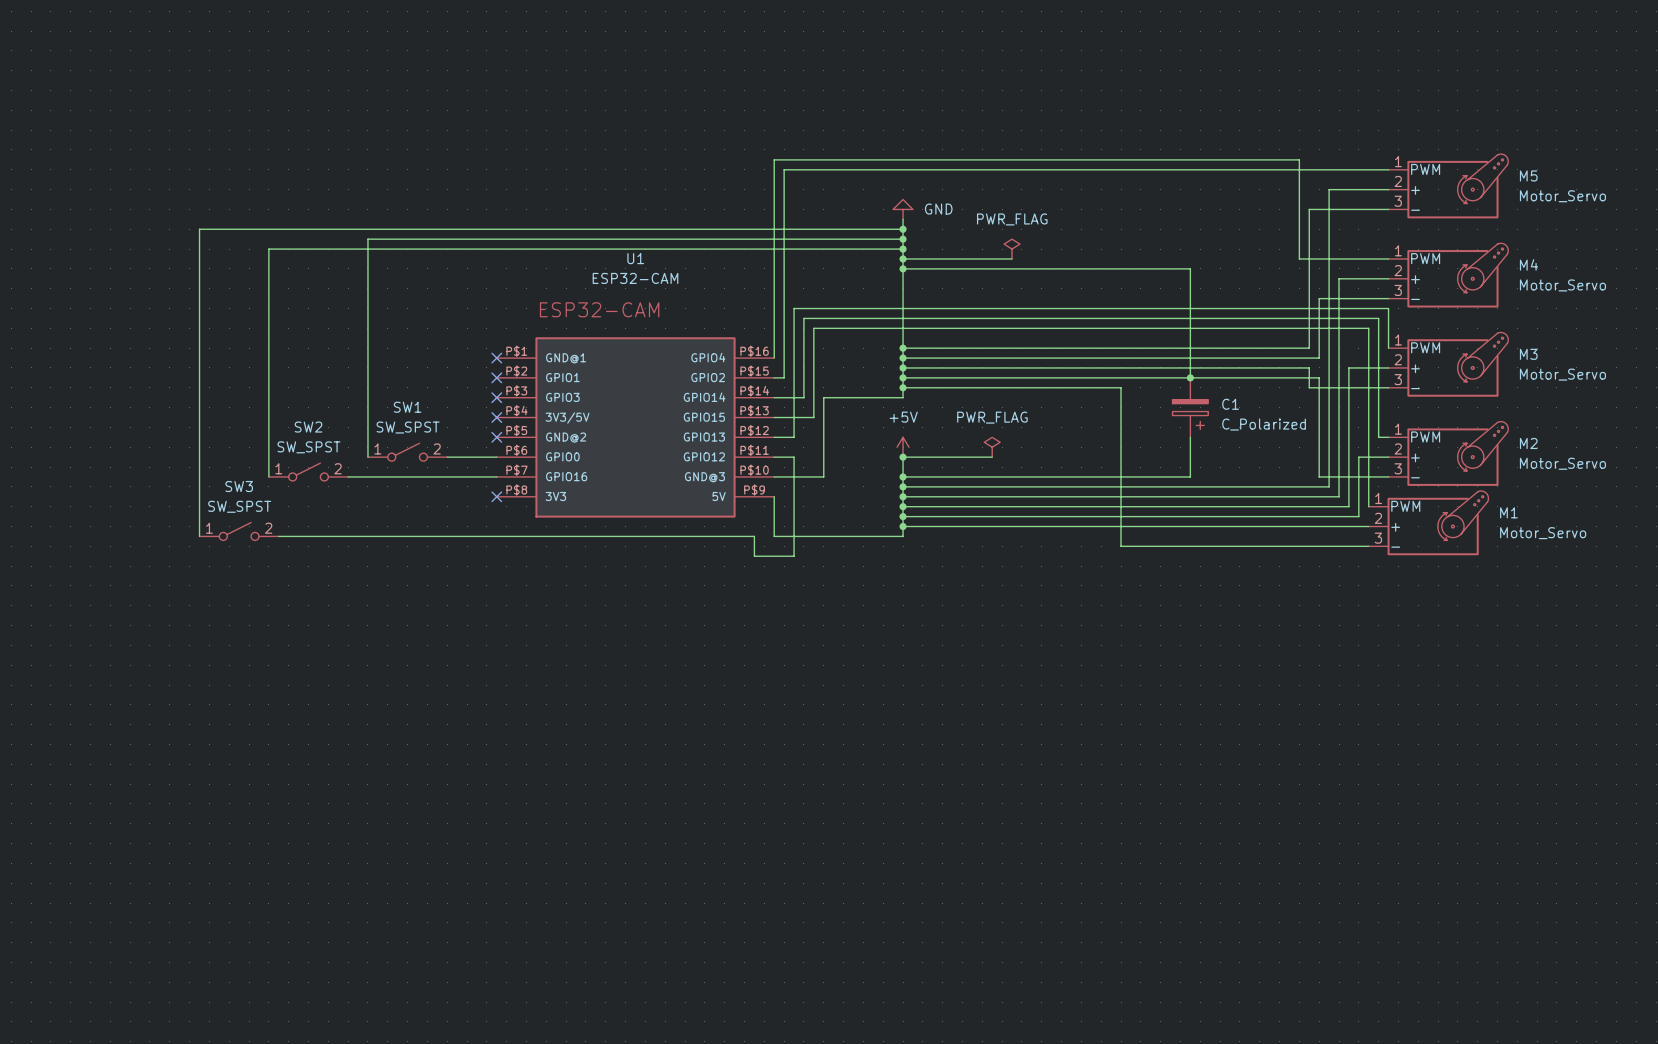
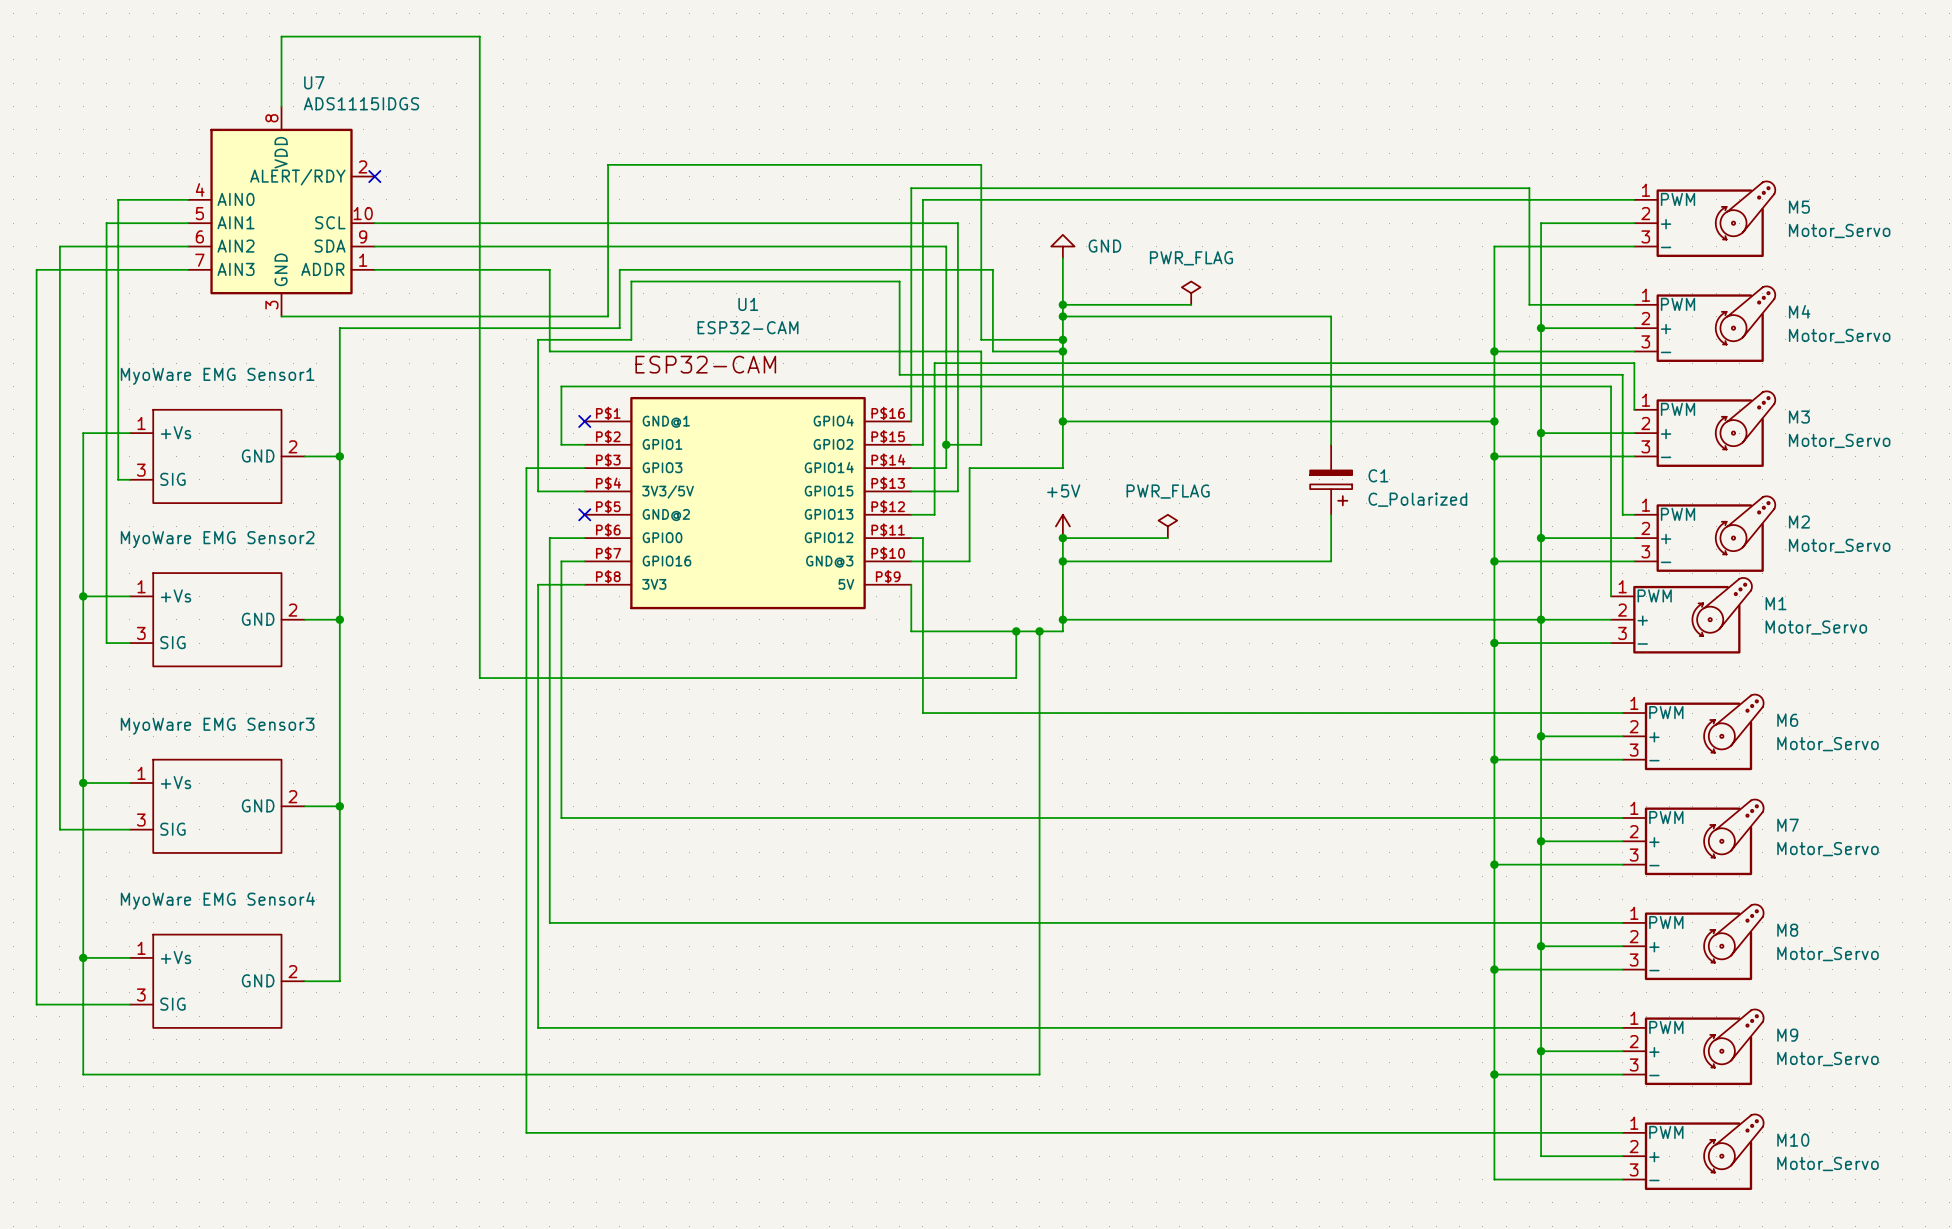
wire: none -> (281, 106) (281, 36) (479, 36) (479, 678) (1016, 678) (1016, 631)
no-connect mark: none -> (374, 176)
wire: none -> (188, 199) (118, 199) (118, 479) (129, 479)
U7: none -> ADS1115IDGS (281, 211)
wire: none -> (188, 223) (106, 223) (106, 643) (129, 643)
wire: none -> (374, 223) (957, 223) (957, 386) (561, 386) (561, 444) (584, 444)
wire: (1329, 189) (1329, 486) (903, 486) -> (1564, 223) (1541, 223) (1541, 246) (1494, 246) (1494, 1179) (1622, 1179)
wire: none -> (188, 246) (59, 246) (59, 829) (129, 829)
wire: none -> (188, 269) (36, 269) (36, 1004) (129, 1004)
wire: (318, 229) (199, 229) (199, 536) -> none
wire: (467, 229) (526, 229) -> (549, 269) (549, 351) (981, 351) (981, 444) (946, 444)
wire: none -> (619, 269) (619, 328) (339, 328) (339, 981) (304, 981)
wire: (843, 229) (903, 229) -> (992, 269) (992, 351) (1062, 351)
junction: (903, 229) -> none
wire: (536, 239) (367, 239) (367, 457) -> (631, 281) (631, 339) (538, 339) (538, 491) (584, 491)
wire: (764, 239) (903, 239) -> (899, 281) (899, 374) (946, 374) (946, 246) (374, 246)
junction: (903, 239) -> none
wire: (903, 249) (268, 249) (268, 476) -> none
junction: (903, 249) -> none
wire: none -> (281, 316) (608, 316) (608, 164) (981, 164) (981, 339) (1062, 339)
wire: (1130, 268) (1190, 268) (1190, 377) -> (1331, 316) (1331, 444)
junction: none -> (1541, 328)
wire: (1339, 278) (1339, 496) (903, 496) -> (1576, 328) (1541, 328)
junction: none -> (1062, 339)
junction: none -> (1062, 351)
junction: none -> (1494, 351)
wire: (1319, 298) (1319, 358) (1269, 358) -> (1552, 351) (1494, 351)
wire: (903, 348) (1309, 348) -> none
junction: (903, 348) -> none
junction: none -> (1494, 421)
wire: none -> (129, 433) (83, 433) (83, 1074) (1039, 1074) (1039, 631)
wire: (903, 367) (1309, 367) -> none
junction: (903, 367) -> none
junction: none -> (1541, 433)
wire: (1348, 367) (1348, 506) (903, 506) -> (1587, 433) (1541, 433) (1541, 409)
no-connect mark: (496, 377) -> none
junction: none -> (946, 444)
wire: (903, 377) (1319, 377) (1319, 476) -> (1494, 561) (1552, 561)
junction: (903, 377) -> none
junction: (1190, 377) -> none
MyoWare EMG Sensor1: none -> (217, 456)
wire: none -> (304, 456) (339, 456)
junction: none -> (339, 456)
wire: (903, 387) (1121, 387) (1121, 546) (1269, 546) -> none
junction: (903, 387) -> none
wire: none -> (1494, 456) (1541, 456) (1541, 1156) (1622, 1156)
junction: none -> (1494, 456)
wire: none -> (584, 468) (526, 468) (526, 1132) (1622, 1132)
no-connect mark: (496, 397) -> none
C1 position: (1190, 407) -> (1331, 479)
no-connect mark: (496, 417) -> none
wire: (1190, 437) (1190, 476) (1130, 476) -> (1331, 514) (1331, 561)
SW1: SW_SPST (407, 452) -> none
wire: (447, 457) (467, 457) -> (1622, 922) (549, 922) (549, 538)
wire: (784, 457) (794, 457) (794, 556) (754, 556) (754, 536) (278, 536) -> (922, 538) (922, 713) (1622, 713)
junction: none -> (1541, 538)
wire: (1358, 457) (1358, 516) (903, 516) -> (1599, 538) (1541, 538)
SW2: SW_SPST (308, 472) -> none
wire: (348, 476) (476, 476) -> (1622, 817) (561, 817) (561, 561)
junction: none -> (1494, 561)
junction: (903, 486) -> none
wire: none -> (584, 584) (538, 584) (538, 1027) (1622, 1027)
no-connect mark: (496, 496) -> none
junction: (903, 496) -> none
wire: none -> (83, 596) (129, 596)
junction: none -> (83, 596)
junction: (903, 506) -> none
junction: (903, 516) -> none
MyoWare EMG Sensor2: none -> (217, 619)
wire: none -> (304, 619) (339, 619)
junction: none -> (339, 619)
junction: none -> (1541, 619)
SW3: SW_SPST (239, 531) -> none
junction: none -> (1016, 631)
junction: none -> (1039, 631)
junction: none -> (1494, 643)
M6: none -> Motor_Servo (1693, 732)
wire: none -> (1541, 736) (1622, 736)
junction: none -> (1541, 736)
wire: none -> (1494, 759) (1622, 759)
junction: none -> (1494, 759)
wire: none -> (83, 783) (129, 783)
junction: none -> (83, 783)
MyoWare EMG Sensor3: none -> (217, 806)
wire: none -> (304, 806) (339, 806)
junction: none -> (339, 806)
M7: none -> Motor_Servo (1693, 837)
wire: none -> (1541, 841) (1622, 841)
junction: none -> (1541, 841)
wire: none -> (1494, 864) (1622, 864)
junction: none -> (1494, 864)
M8: none -> Motor_Servo (1693, 942)
wire: none -> (1541, 946) (1622, 946)
junction: none -> (1541, 946)
wire: none -> (83, 957) (129, 957)
junction: none -> (83, 957)
wire: none -> (1494, 969) (1622, 969)
junction: none -> (1494, 969)
MyoWare EMG Sensor4: none -> (217, 981)
M9: none -> Motor_Servo (1693, 1047)
wire: none -> (1541, 1051) (1622, 1051)
junction: none -> (1541, 1051)
wire: none -> (1494, 1074) (1622, 1074)
junction: none -> (1494, 1074)
M10: none -> Motor_Servo (1693, 1152)

